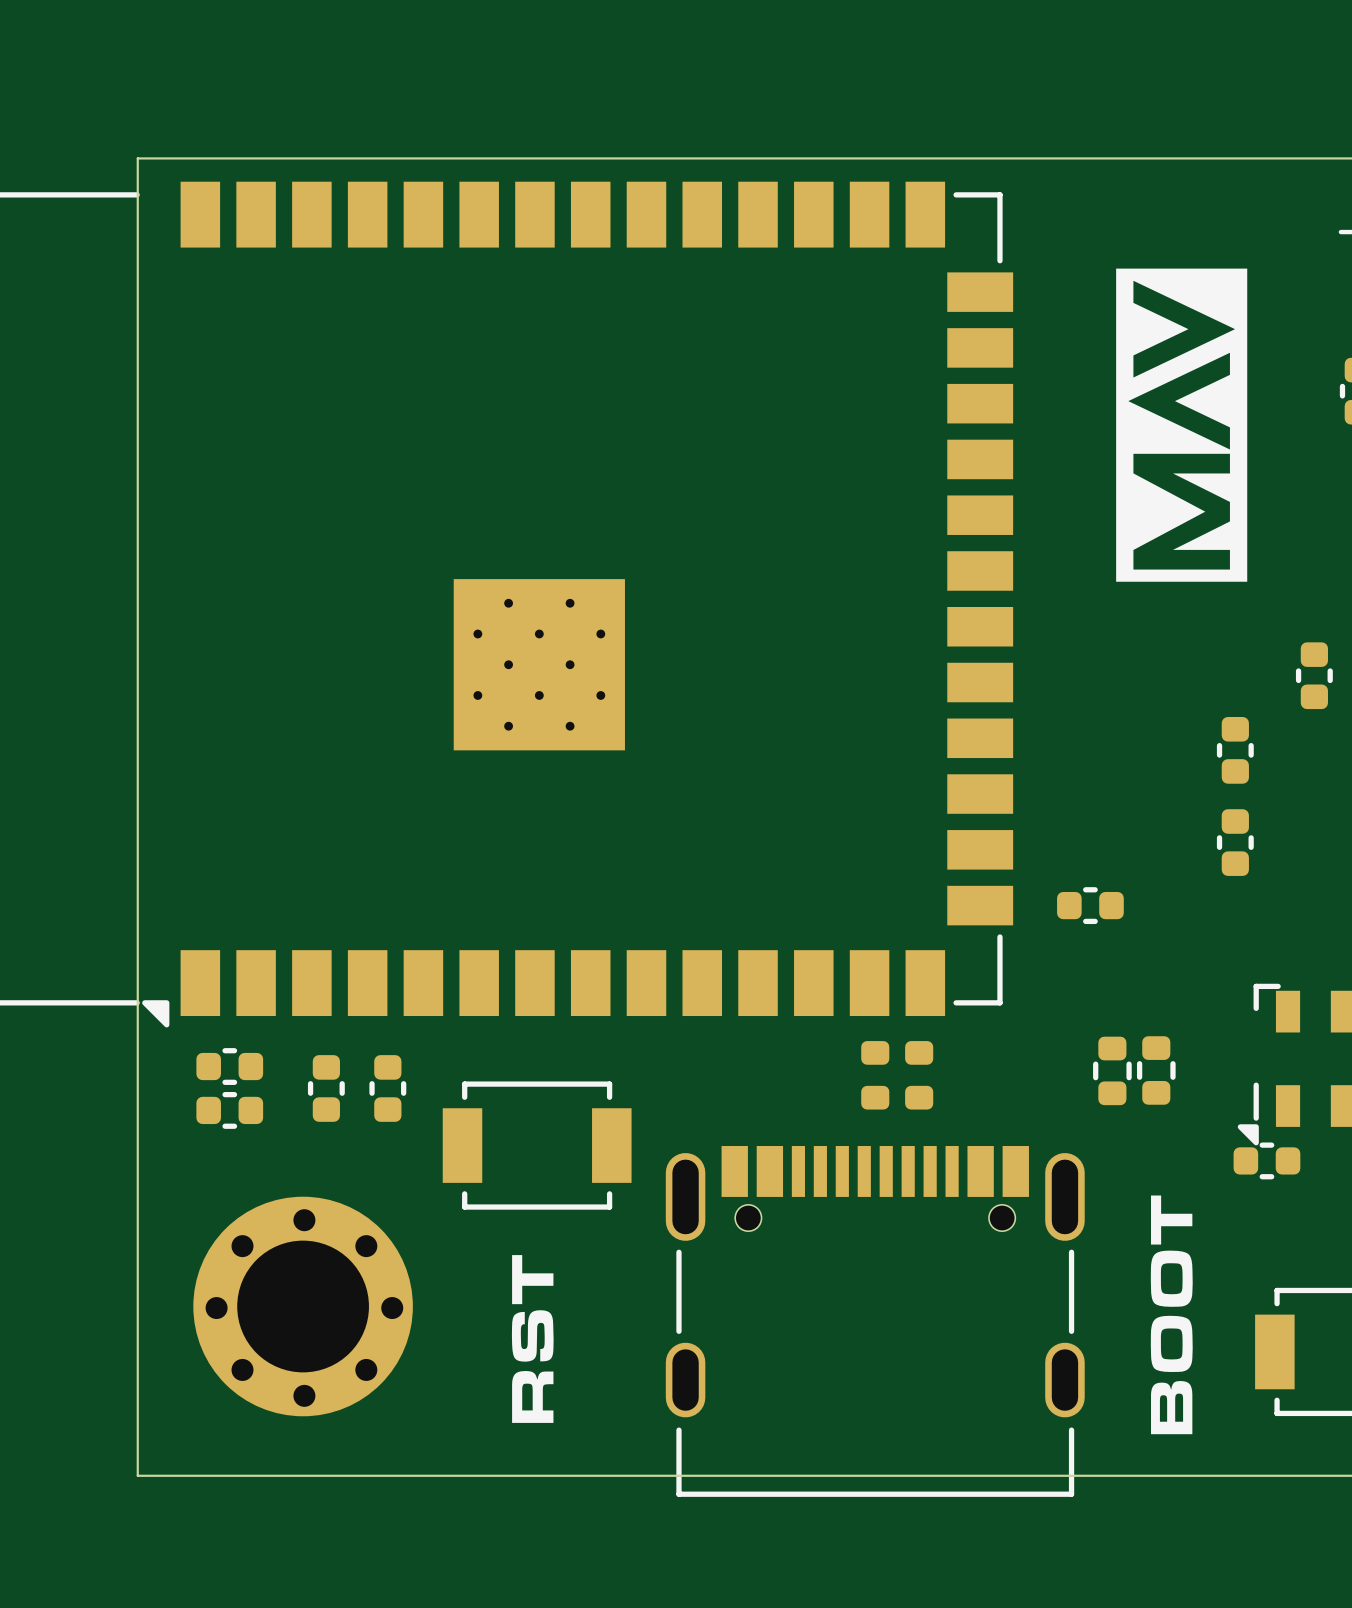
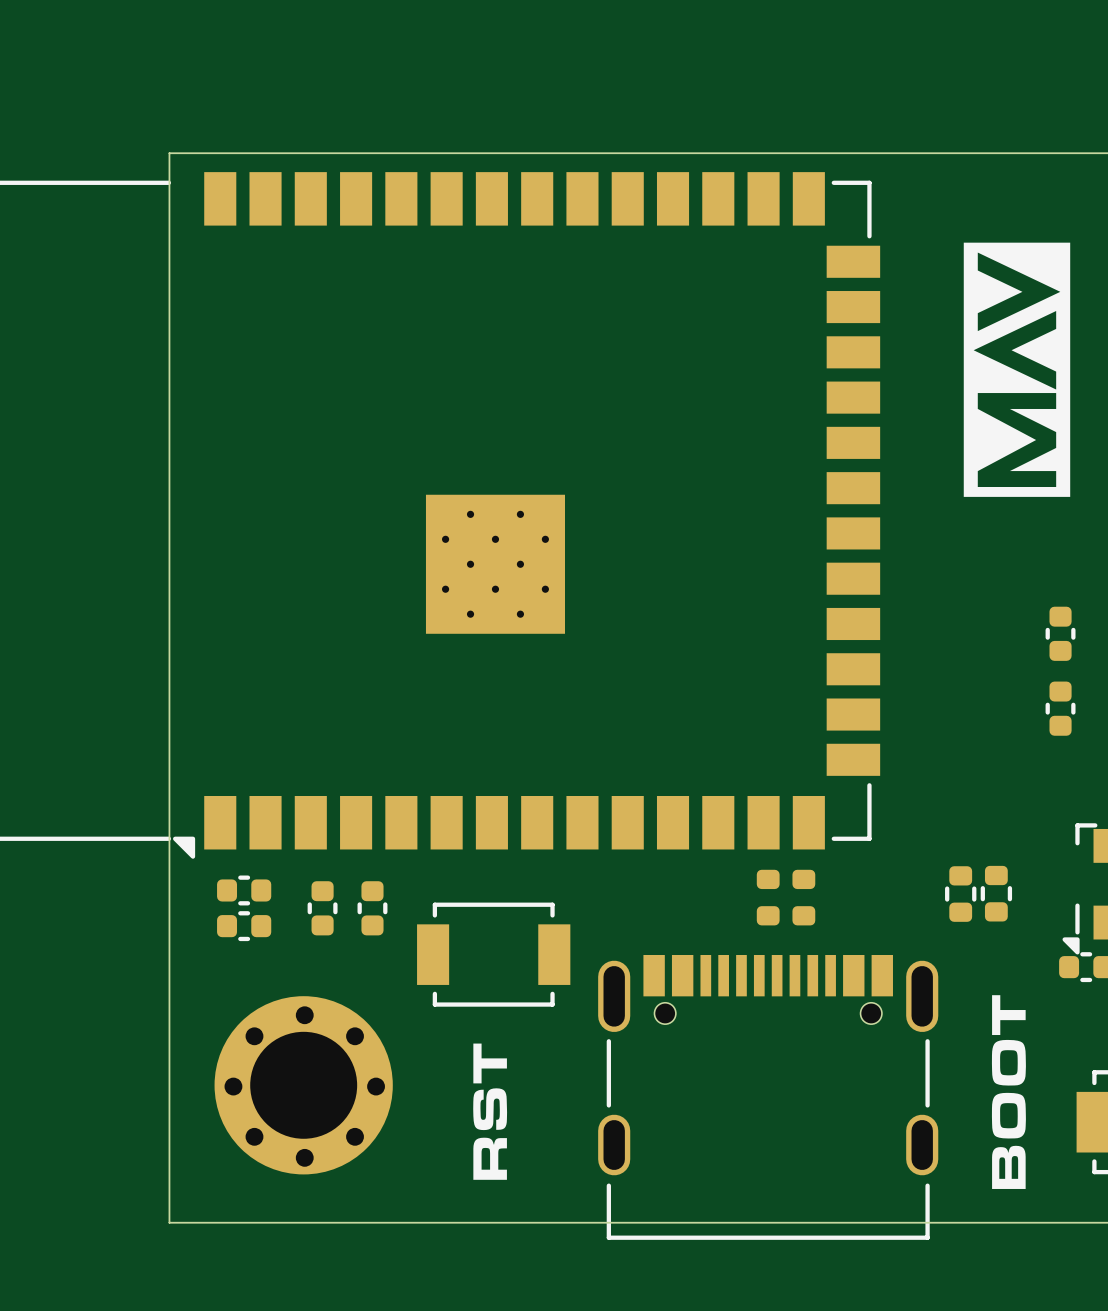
part: (1090, 905) -> none

